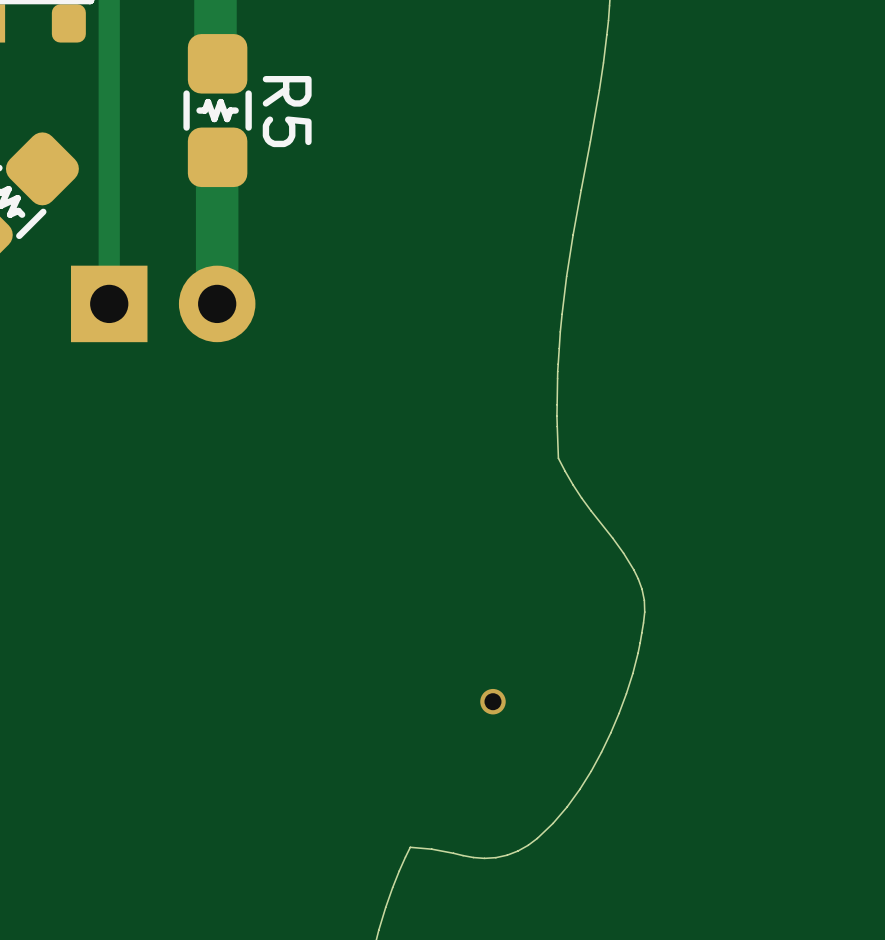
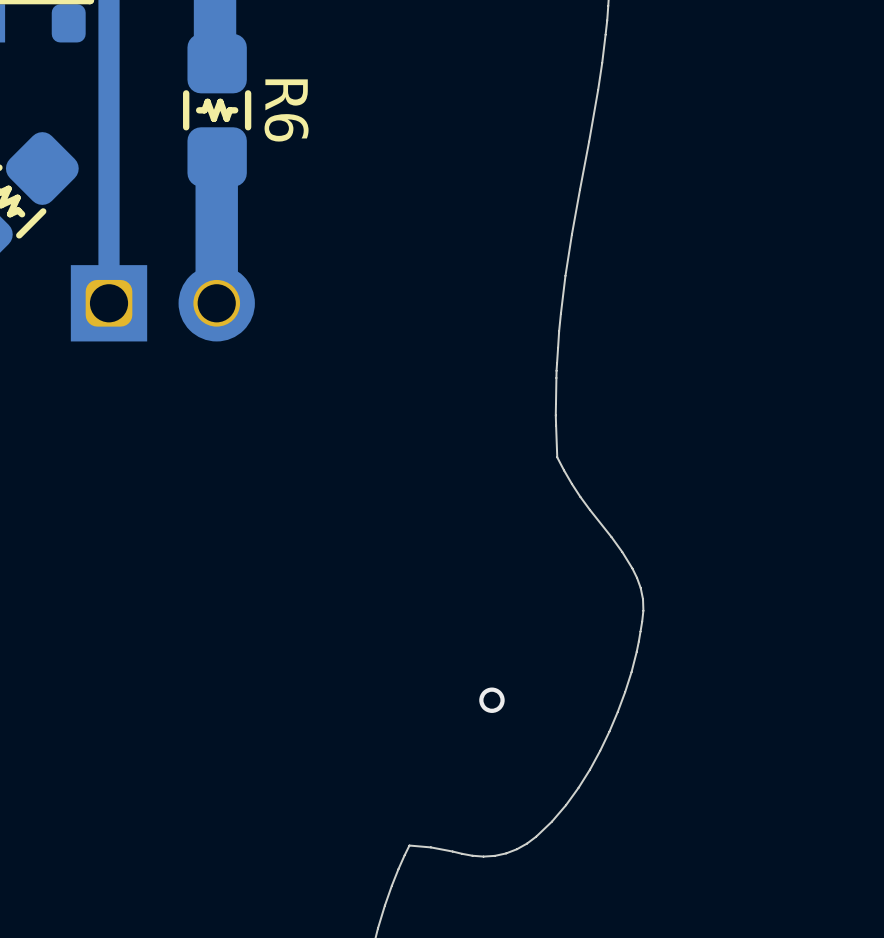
R5 name: R5 (287, 111) -> R6 (286, 110)

